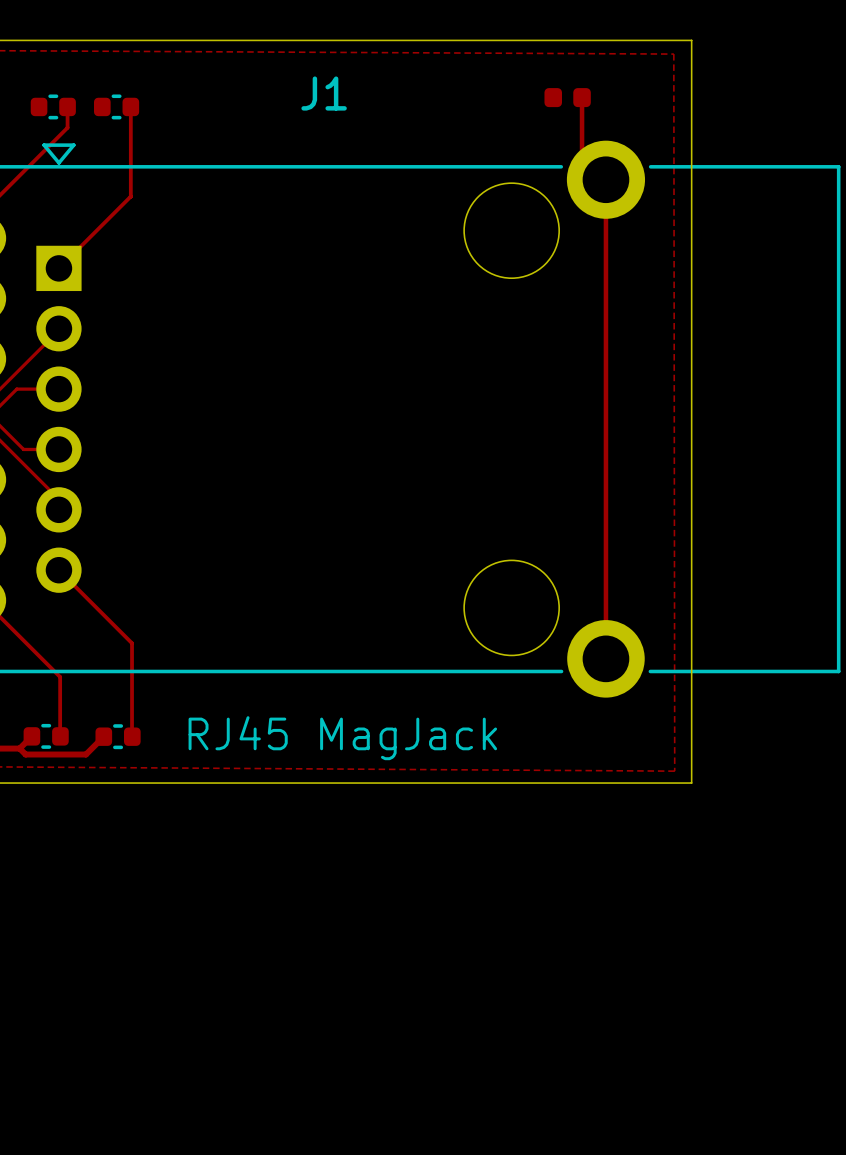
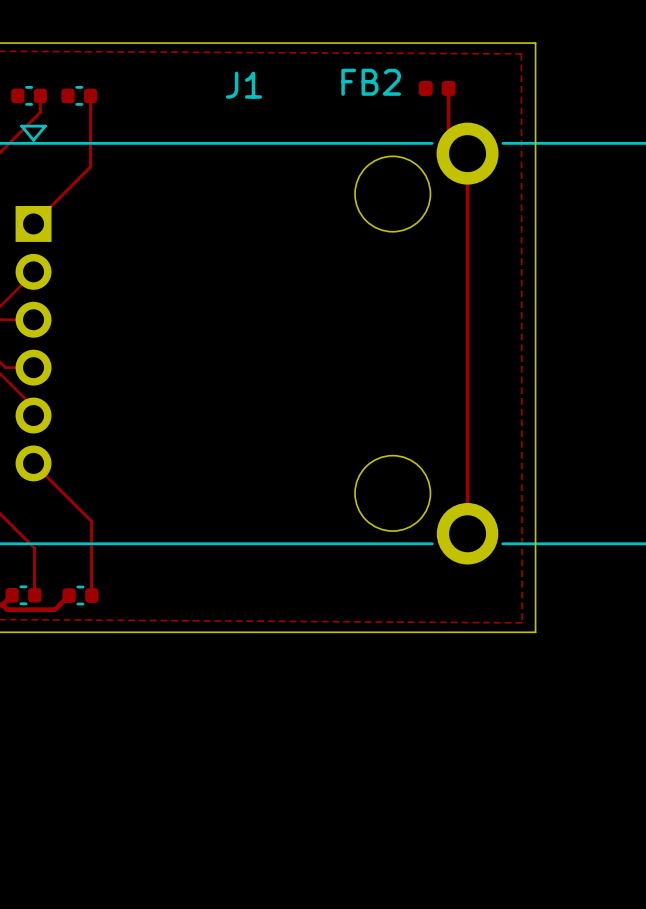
FB2 name: none -> FB2 (371, 82)
text: RJ45 MagJack (342, 738) -> none

